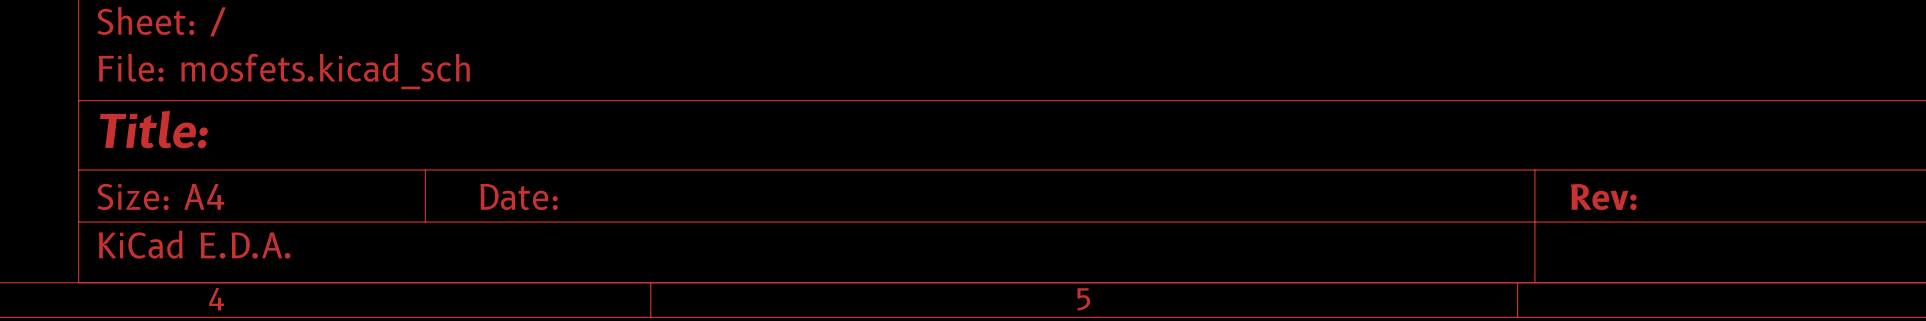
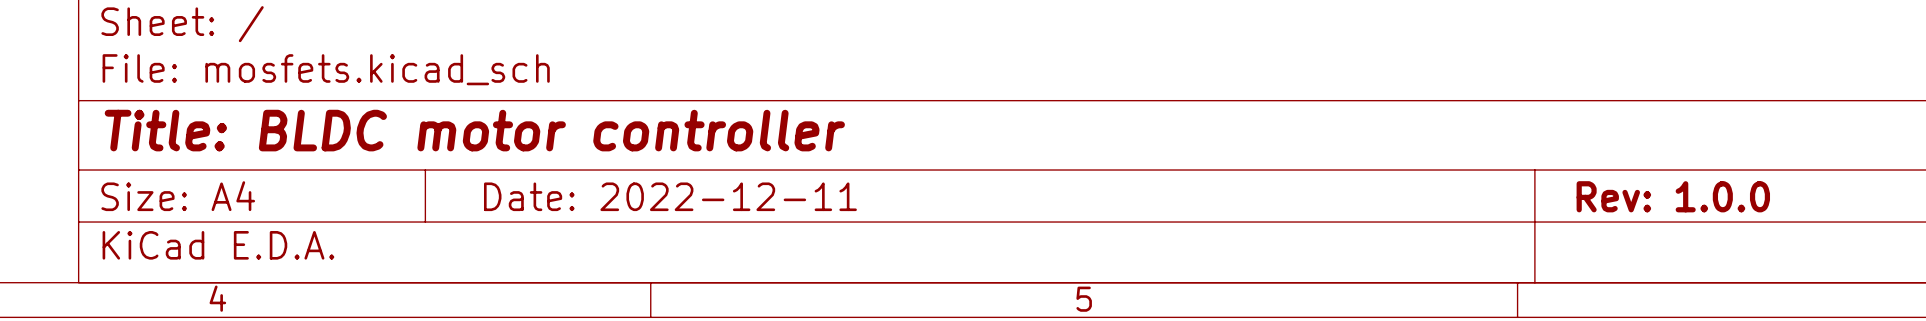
title block: Title: (153, 129) -> Title: BLDC motor controller (474, 130)
title block: Date: (519, 196) -> Date: 2022-12-11 (670, 196)
title block: Rev: (1603, 197) -> Rev: 1.0.0 (1673, 196)

